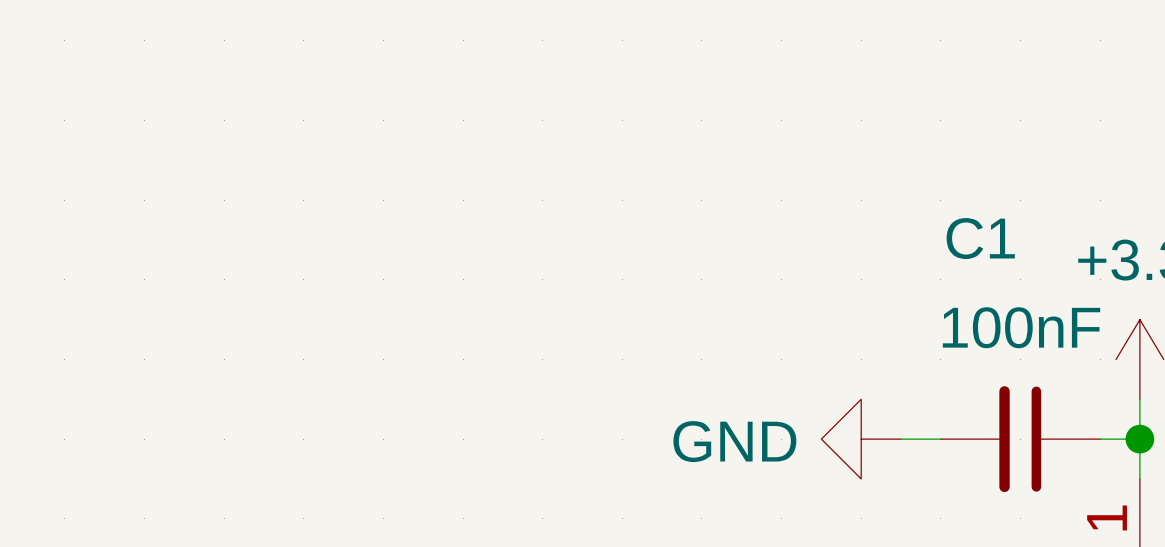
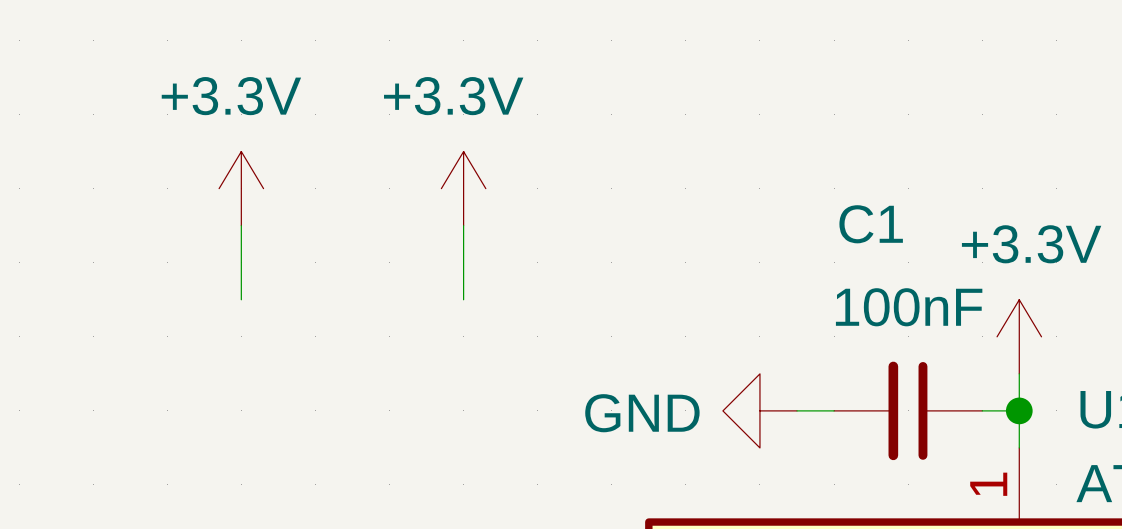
power symbol: none -> +3.3V (241, 188)
power symbol: none -> +3.3V (463, 188)
wire: none -> (241, 225) (241, 299)
wire: none -> (463, 225) (463, 299)

